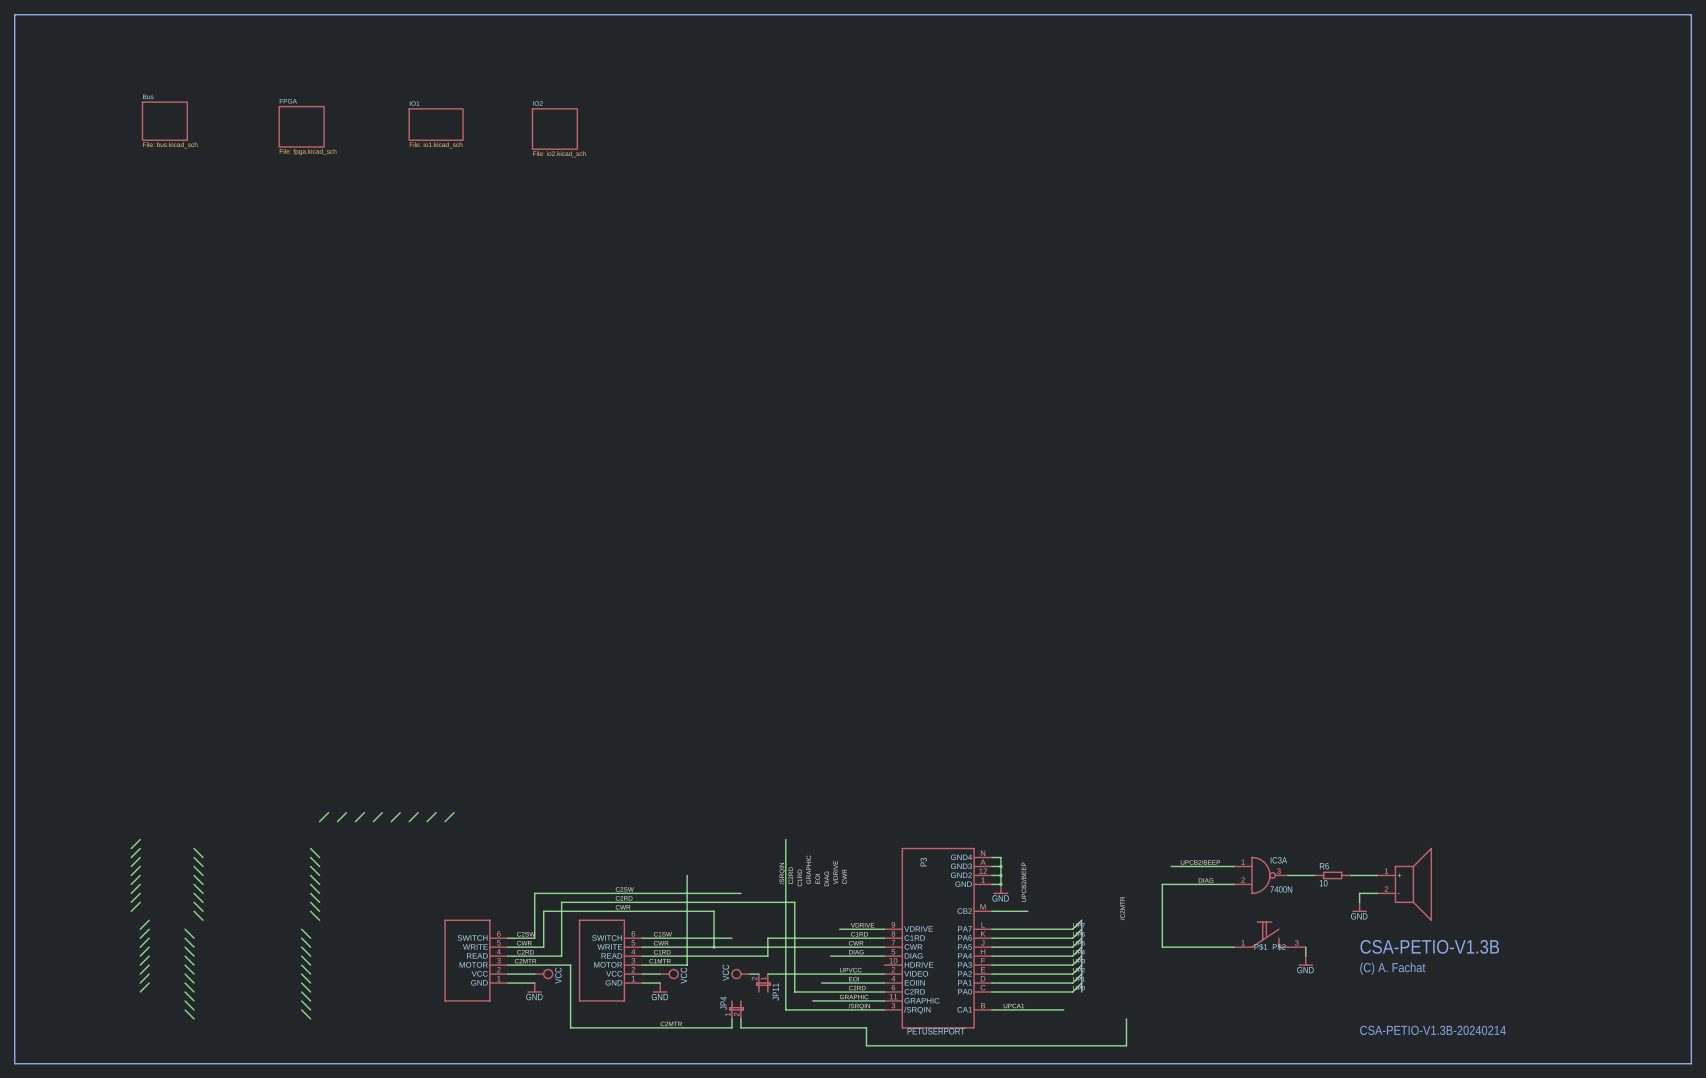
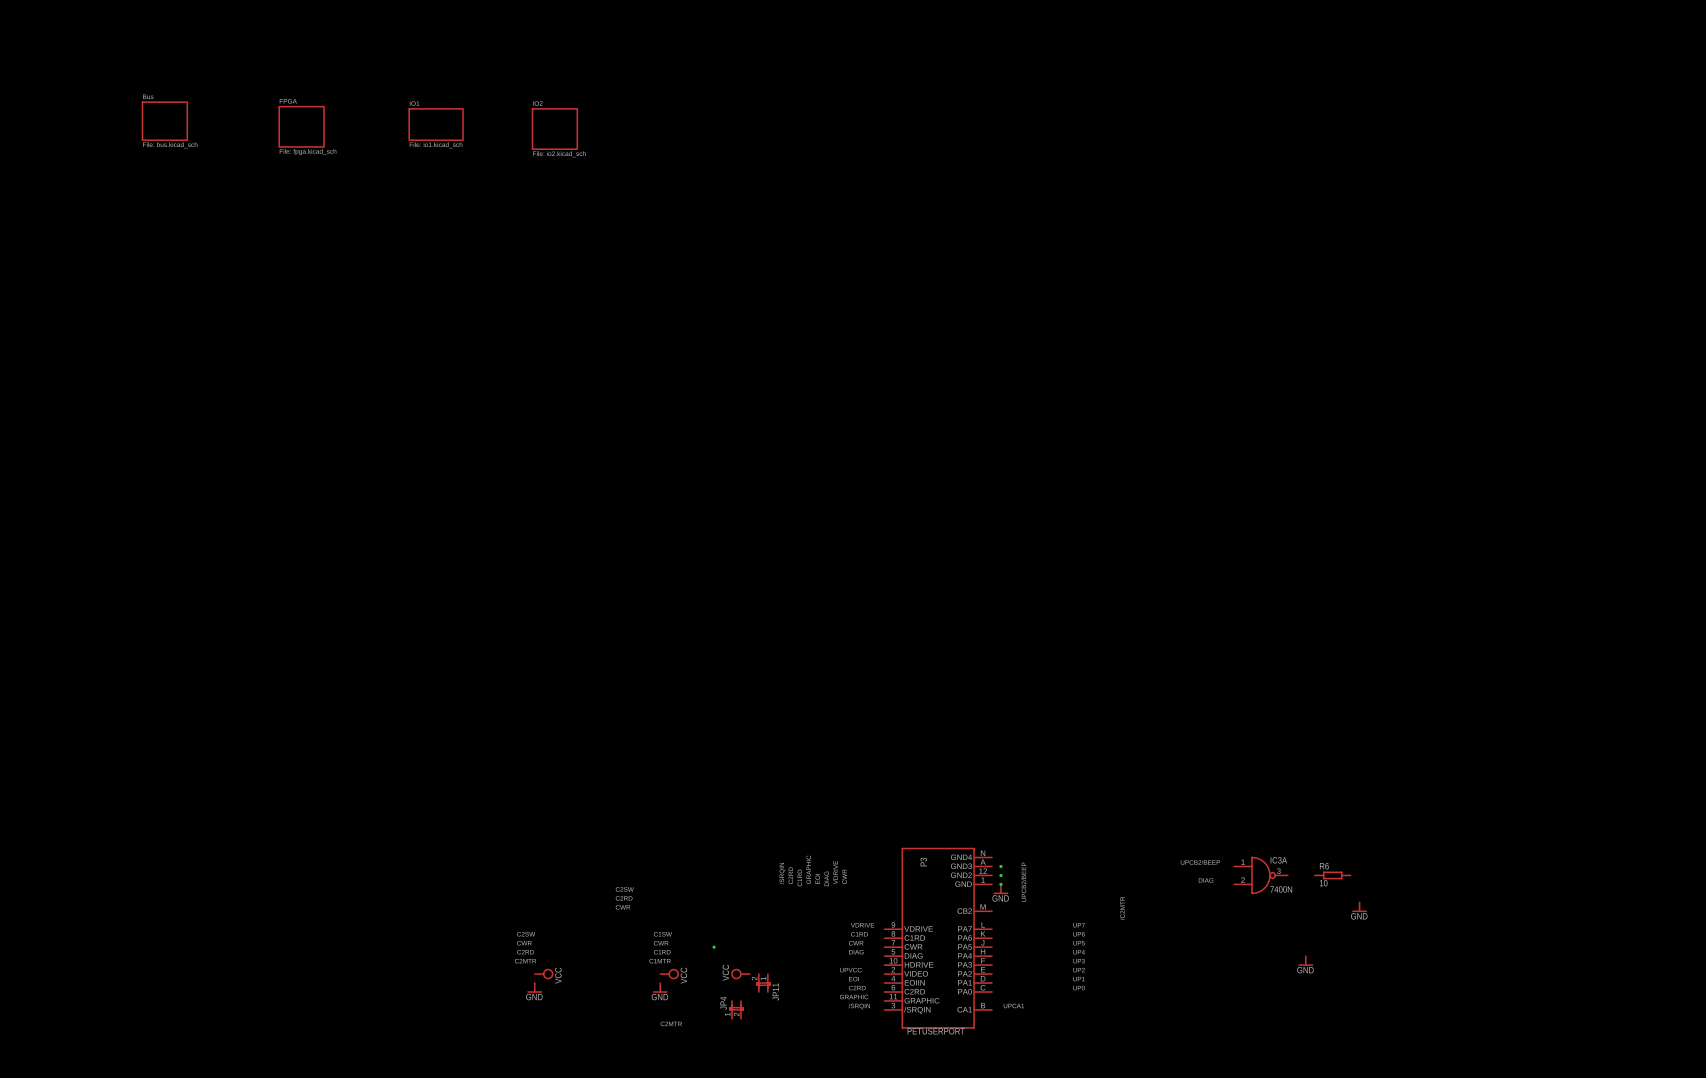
line: (14, 14) (14, 1063) (1691, 1063) (1691, 14) (14, 14) -> none
wire: (328, 812) (319, 821) -> none
wire: (346, 812) (337, 821) -> none
wire: (364, 812) (355, 821) -> none
wire: (382, 812) (373, 821) -> none
wire: (400, 812) (391, 821) -> none
wire: (418, 812) (409, 821) -> none
wire: (436, 812) (427, 821) -> none
wire: (454, 812) (445, 821) -> none
wire: (140, 839) (131, 848) -> none
wire: (785, 839) (785, 1009) (884, 1009) -> none
wire: (140, 848) (131, 857) -> none
wire: (194, 848) (203, 857) -> none
wire: (310, 848) (319, 857) -> none
wire: (140, 857) (131, 866) -> none
wire: (194, 857) (203, 866) -> none
wire: (310, 857) (319, 866) -> none
wire: (992, 857) (1000, 857) (1000, 884) (992, 884) -> none
wire: (140, 866) (131, 875) -> none
wire: (194, 866) (203, 875) -> none
wire: (310, 866) (319, 875) -> none
wire: (992, 866) (1000, 866) -> none
wire: (1171, 866) (1234, 866) -> none
wire: (140, 875) (131, 884) -> none
wire: (194, 875) (203, 884) -> none
wire: (310, 875) (319, 884) -> none
wire: (687, 875) (687, 965) (642, 965) -> none
wire: (992, 875) (1000, 875) -> none
wire: (1287, 875) (1314, 875) -> none
wire: (1350, 875) (1377, 875) -> none
wire: (140, 884) (131, 893) -> none
wire: (194, 884) (203, 893) -> none
wire: (310, 884) (319, 893) -> none
wire: (1234, 884) (1162, 884) (1162, 947) (1234, 947) -> none
part: (1404, 884) -> none
wire: (140, 893) (131, 902) -> none
wire: (194, 893) (203, 902) -> none
wire: (310, 893) (319, 902) -> none
wire: (740, 893) (534, 893) (534, 938) (507, 938) -> none
wire: (1377, 893) (1359, 893) (1359, 902) -> none
wire: (140, 902) (131, 911) -> none
wire: (194, 902) (203, 911) -> none
wire: (310, 902) (319, 911) -> none
wire: (194, 911) (203, 920) -> none
wire: (310, 911) (319, 920) -> none
wire: (992, 911) (1027, 911) -> none
wire: (149, 920) (140, 929) -> none
wire: (1081, 920) (1072, 929) (992, 929) -> none
bus: (1081, 920) (1081, 992) -> none
wire: (149, 929) (140, 938) -> none
wire: (185, 929) (194, 938) -> none
wire: (301, 929) (310, 938) -> none
wire: (839, 929) (884, 929) -> none
wire: (1081, 929) (1072, 938) (992, 938) -> none
part: (1269, 934) -> none
wire: (149, 938) (140, 947) -> none
wire: (185, 938) (194, 947) -> none
wire: (301, 938) (310, 947) -> none
wire: (642, 938) (731, 938) -> none
wire: (884, 938) (767, 938) (767, 956) (642, 956) -> none
wire: (1081, 938) (1072, 947) (992, 947) -> none
text: CSA-PETIO-V1.3B (1429, 946) -> none
wire: (149, 947) (140, 956) -> none
wire: (185, 947) (194, 956) -> none
wire: (301, 947) (310, 956) -> none
wire: (507, 947) (543, 947) (543, 911) (714, 911) (714, 947) -> none
wire: (642, 947) (884, 947) -> none
wire: (1081, 947) (1072, 956) (992, 956) -> none
wire: (1305, 947) (1305, 956) -> none
wire: (149, 956) (140, 965) -> none
wire: (185, 956) (194, 965) -> none
wire: (301, 956) (310, 965) -> none
wire: (507, 956) (561, 956) (561, 902) (794, 902) (794, 992) (884, 992) -> none
wire: (830, 956) (884, 956) -> none
wire: (1081, 956) (1072, 965) (992, 965) -> none
part: (476, 960) -> none
part: (610, 960) -> none
wire: (149, 965) (140, 974) -> none
wire: (185, 965) (194, 974) -> none
wire: (301, 965) (310, 974) -> none
wire: (507, 965) (570, 965) (570, 1027) (731, 1027) (731, 1018) -> none
wire: (1081, 965) (1072, 974) (992, 974) -> none
text: (C) A. Fachat (1392, 968) -> none
wire: (149, 974) (140, 983) -> none
wire: (185, 974) (194, 983) -> none
wire: (301, 974) (310, 983) -> none
wire: (507, 974) (534, 974) -> none
wire: (642, 974) (660, 974) -> none
wire: (749, 974) (758, 974) -> none
wire: (767, 974) (884, 974) -> none
wire: (1081, 974) (1072, 983) (992, 983) -> none
wire: (149, 983) (140, 992) -> none
wire: (185, 983) (194, 992) -> none
wire: (301, 983) (310, 992) -> none
wire: (507, 983) (534, 983) -> none
wire: (642, 983) (660, 983) -> none
wire: (821, 983) (884, 983) -> none
wire: (1081, 983) (1072, 992) (992, 992) -> none
wire: (185, 992) (194, 1000) -> none
wire: (301, 992) (310, 1000) -> none
wire: (185, 1000) (194, 1009) -> none
wire: (301, 1000) (310, 1009) -> none
wire: (812, 1000) (884, 1000) -> none
wire: (185, 1009) (194, 1018) -> none
wire: (301, 1009) (310, 1018) -> none
wire: (992, 1009) (1063, 1009) -> none
wire: (740, 1018) (740, 1027) (866, 1027) (866, 1045) (1126, 1045) (1126, 1018) -> none
text: CSA-PETIO-V1.3B-20240214 (1432, 1030) -> none

